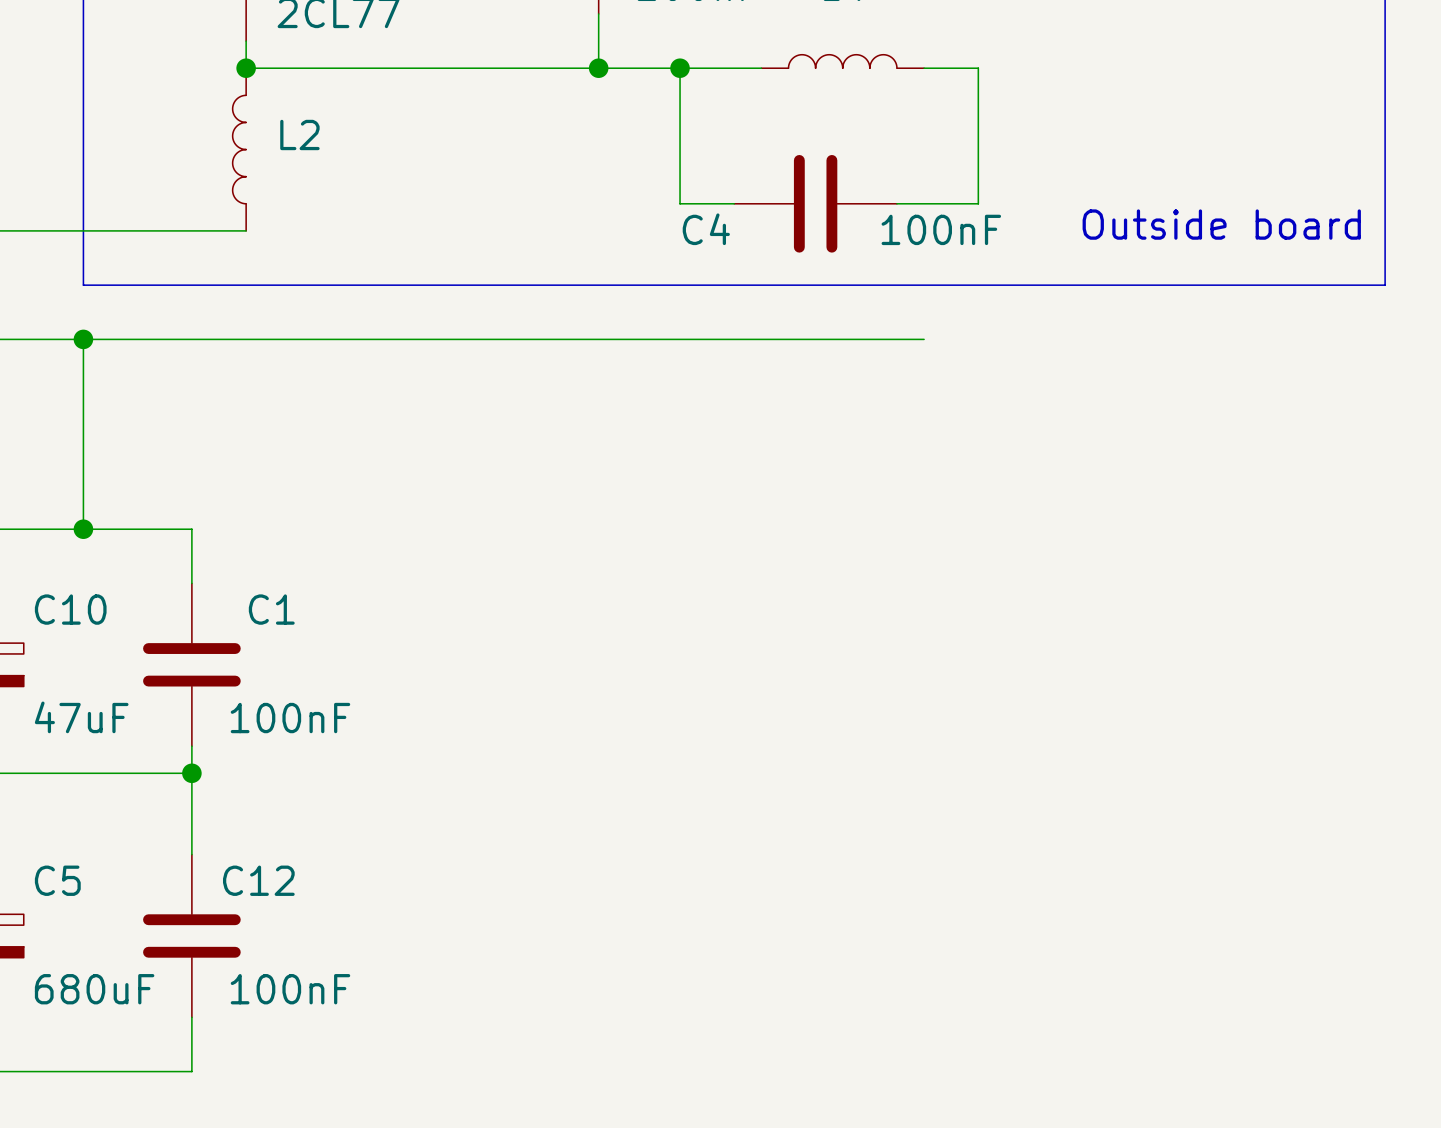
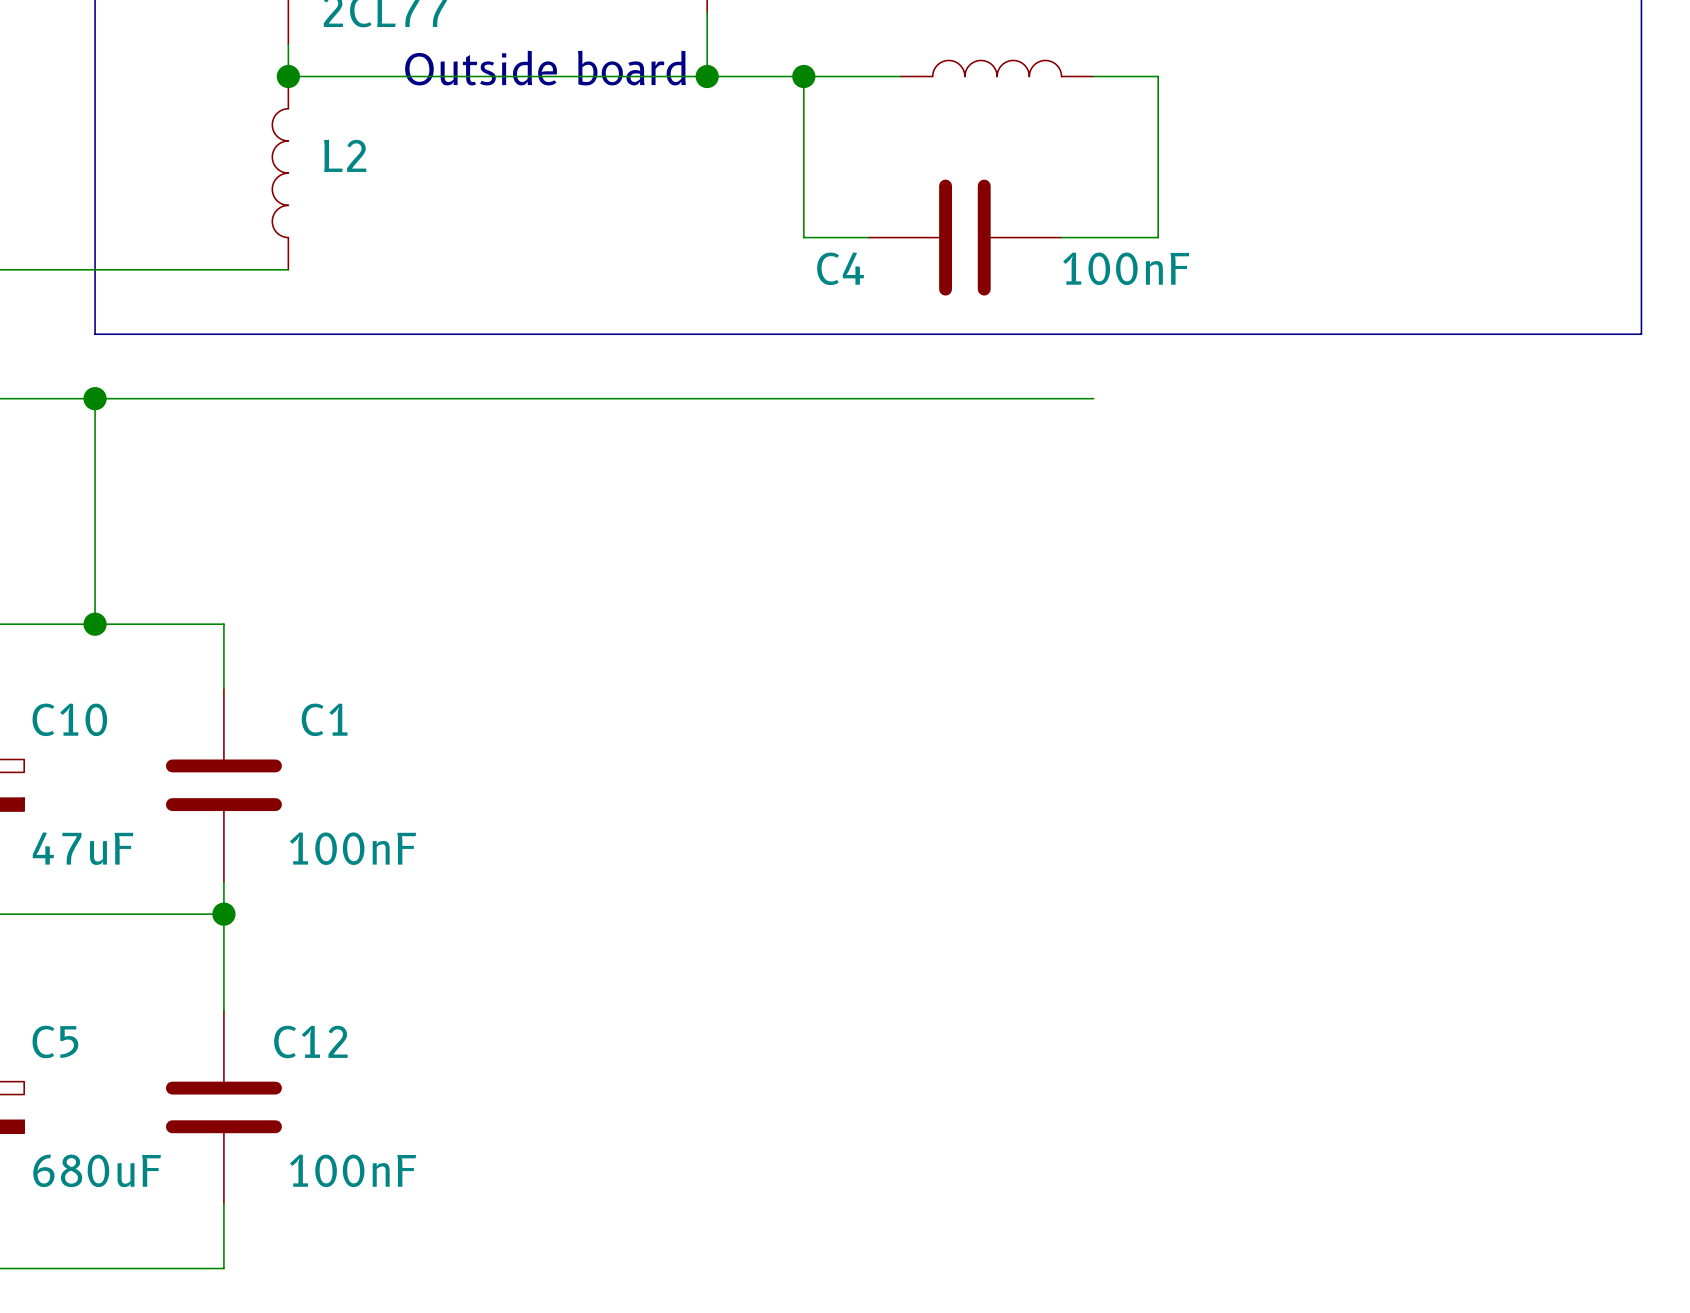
text: none -> Outside board (545, 68)
text: Outside board (1221, 224) -> none

